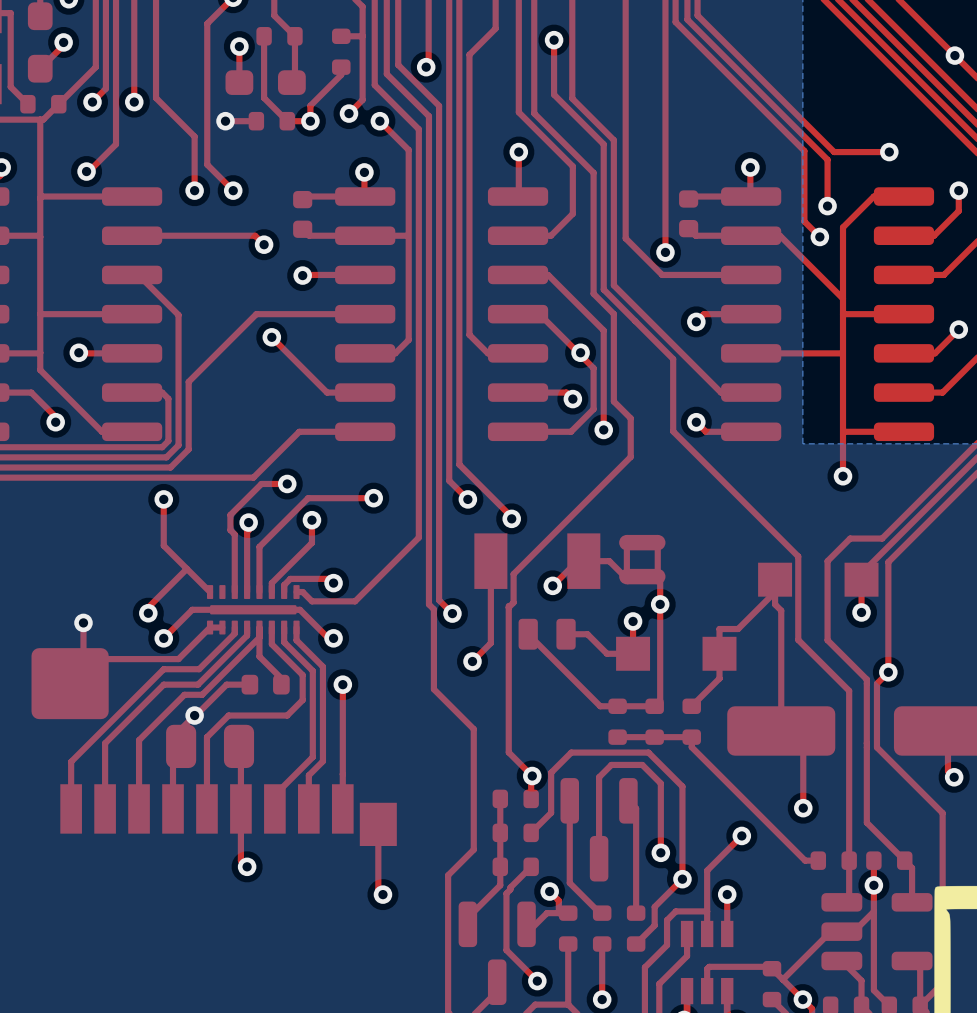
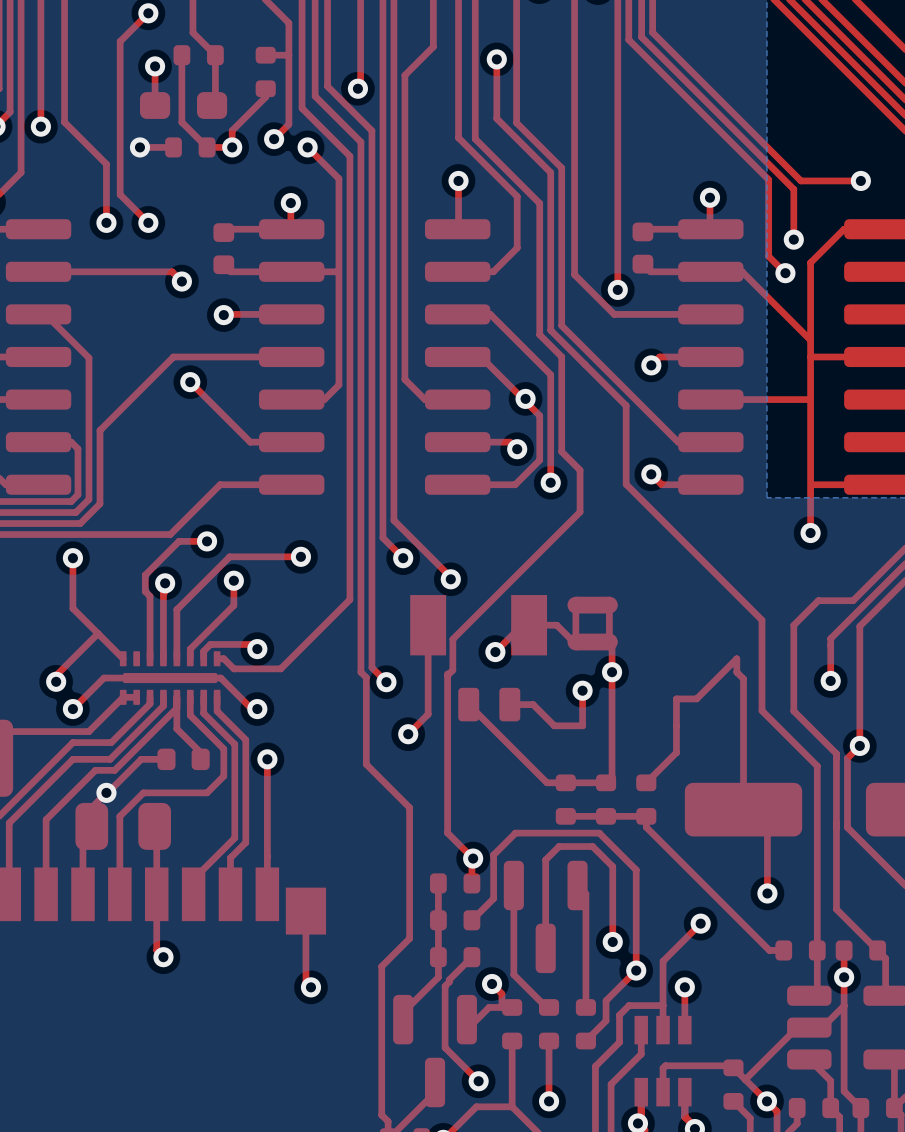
part: (818, 579) -> none
part: (676, 653) -> none

